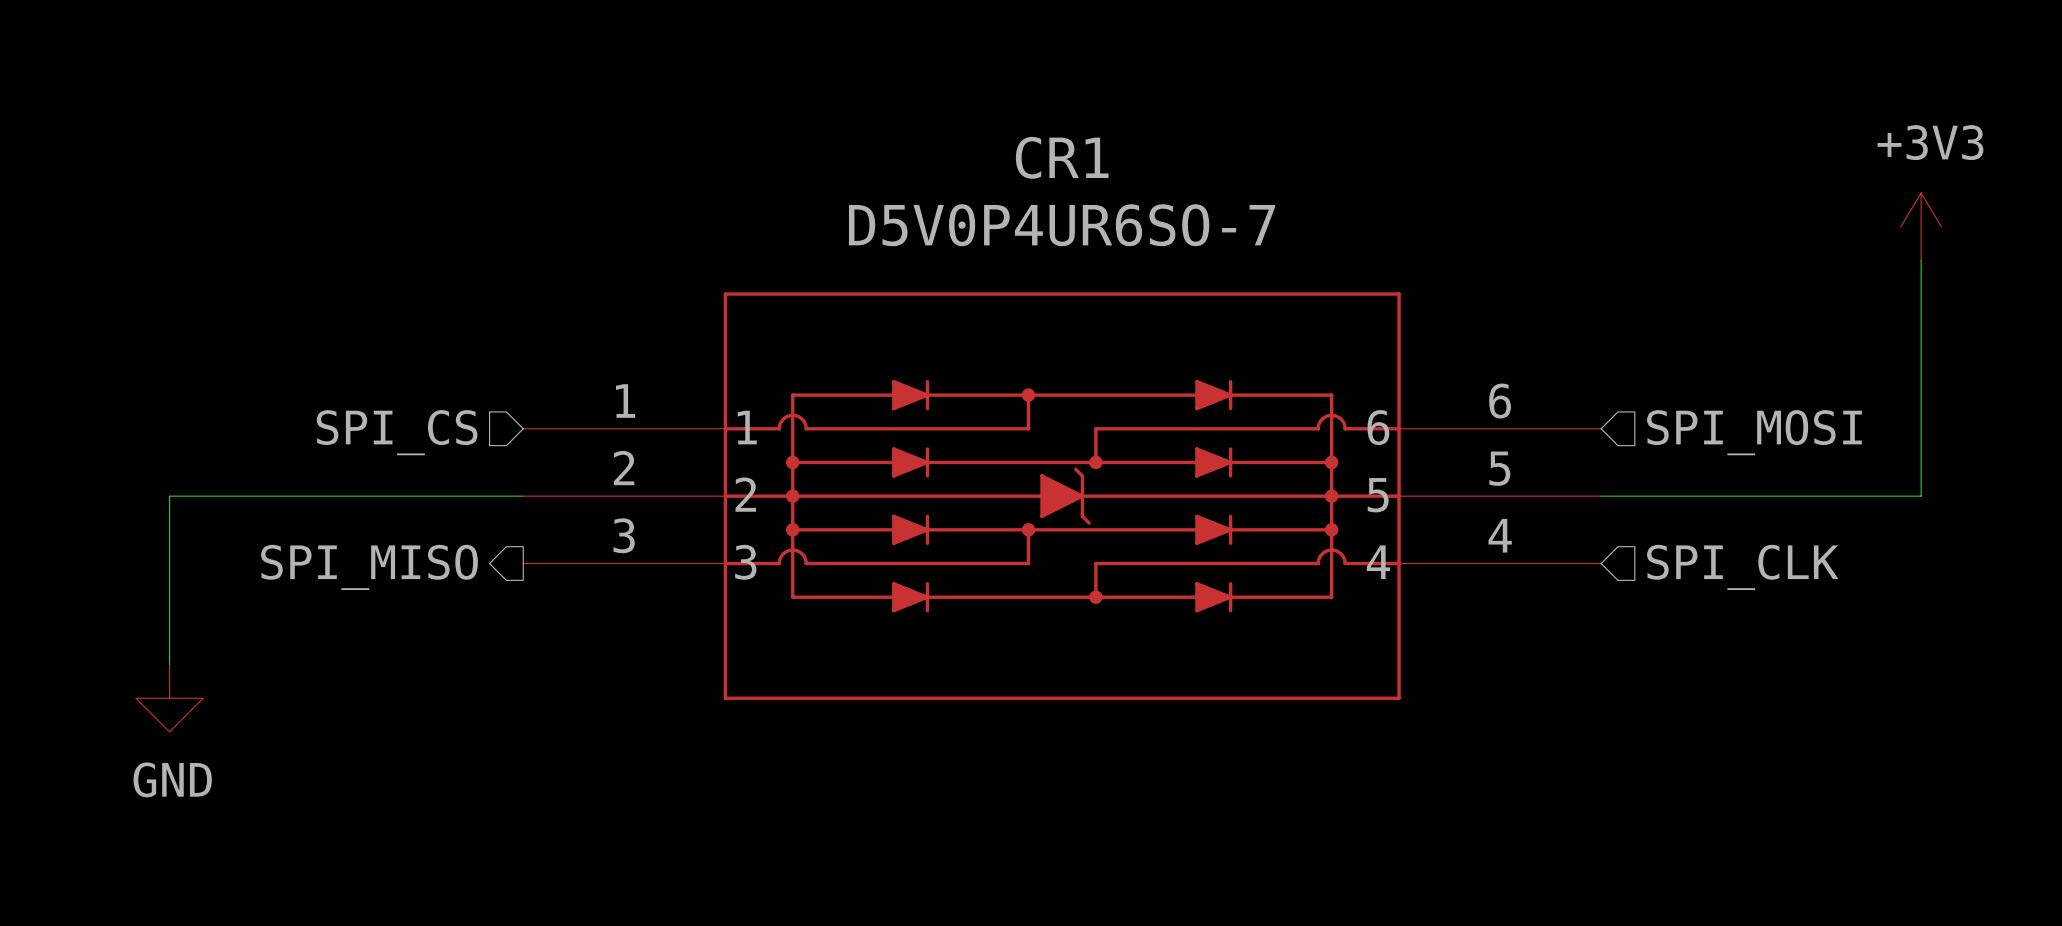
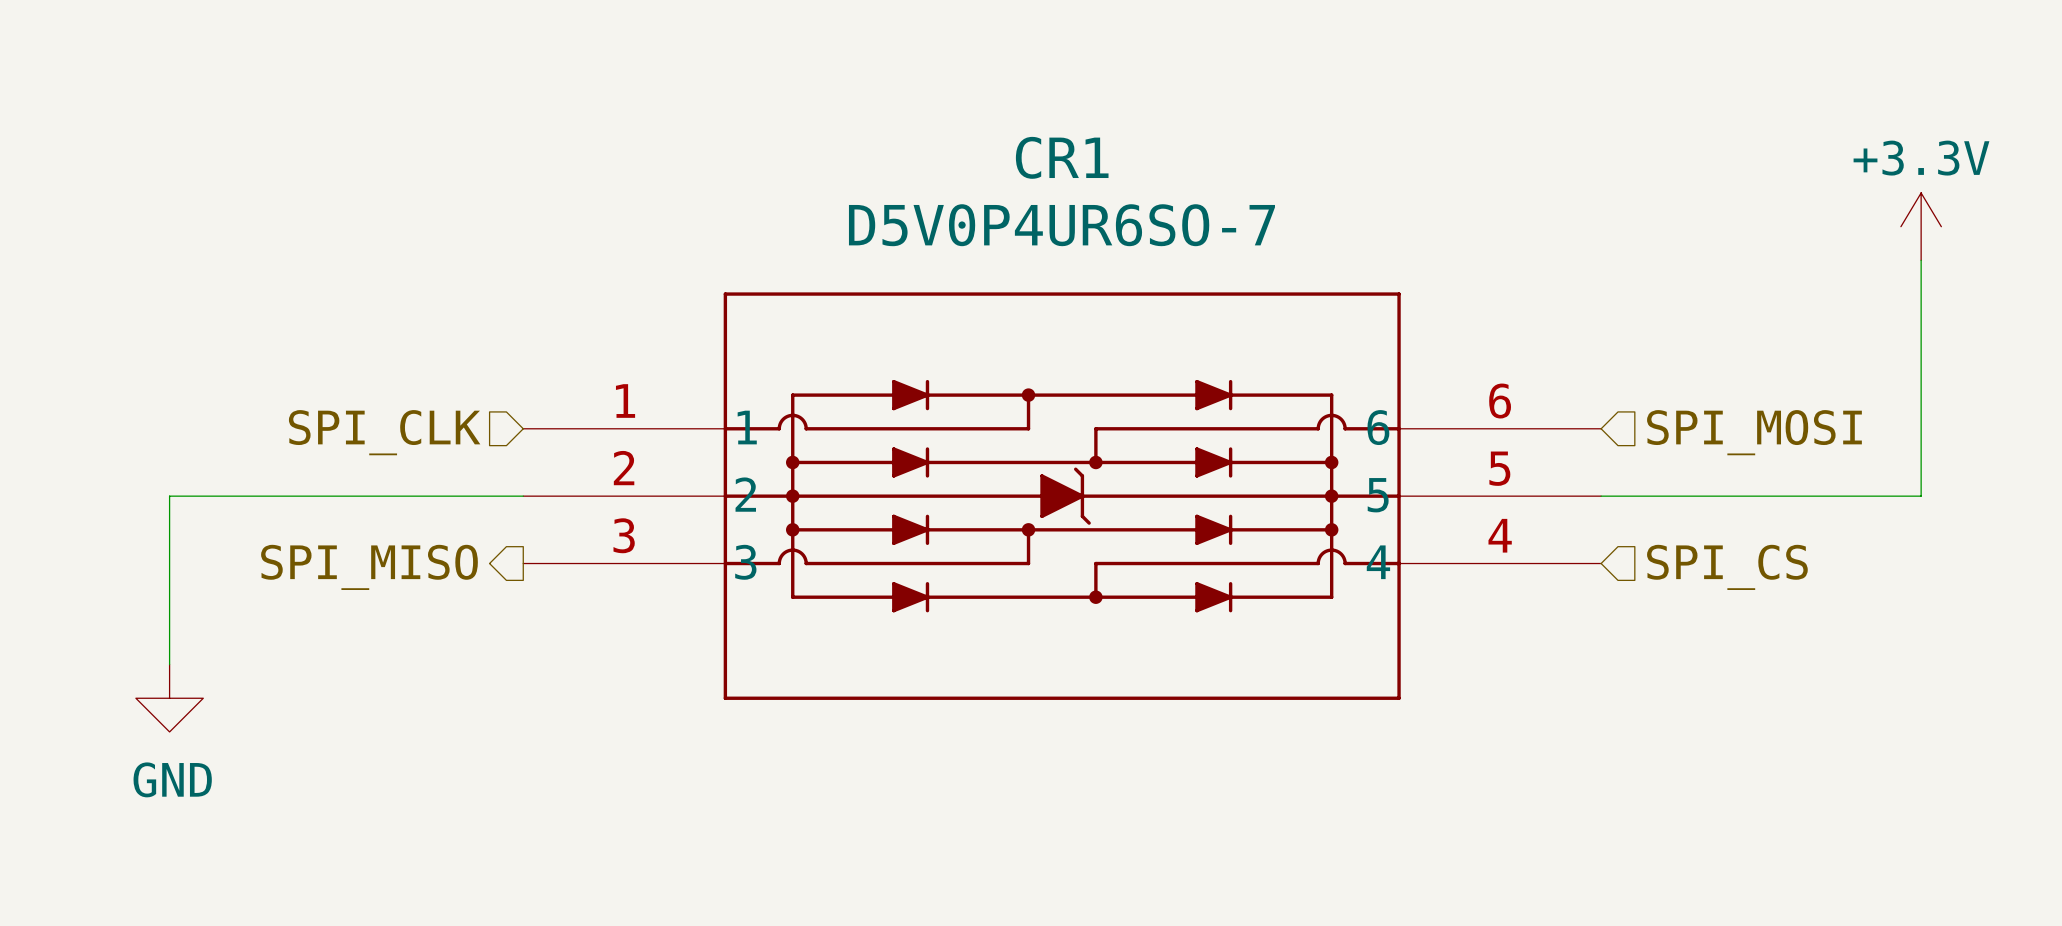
power symbol: +3V3 (1921, 226) -> +3.3V (1921, 226)
hierarchical label: SPI_CS (397, 432) -> SPI_CLK (384, 432)
hierarchical label: SPI_CLK (1742, 567) -> SPI_CS (1727, 567)

